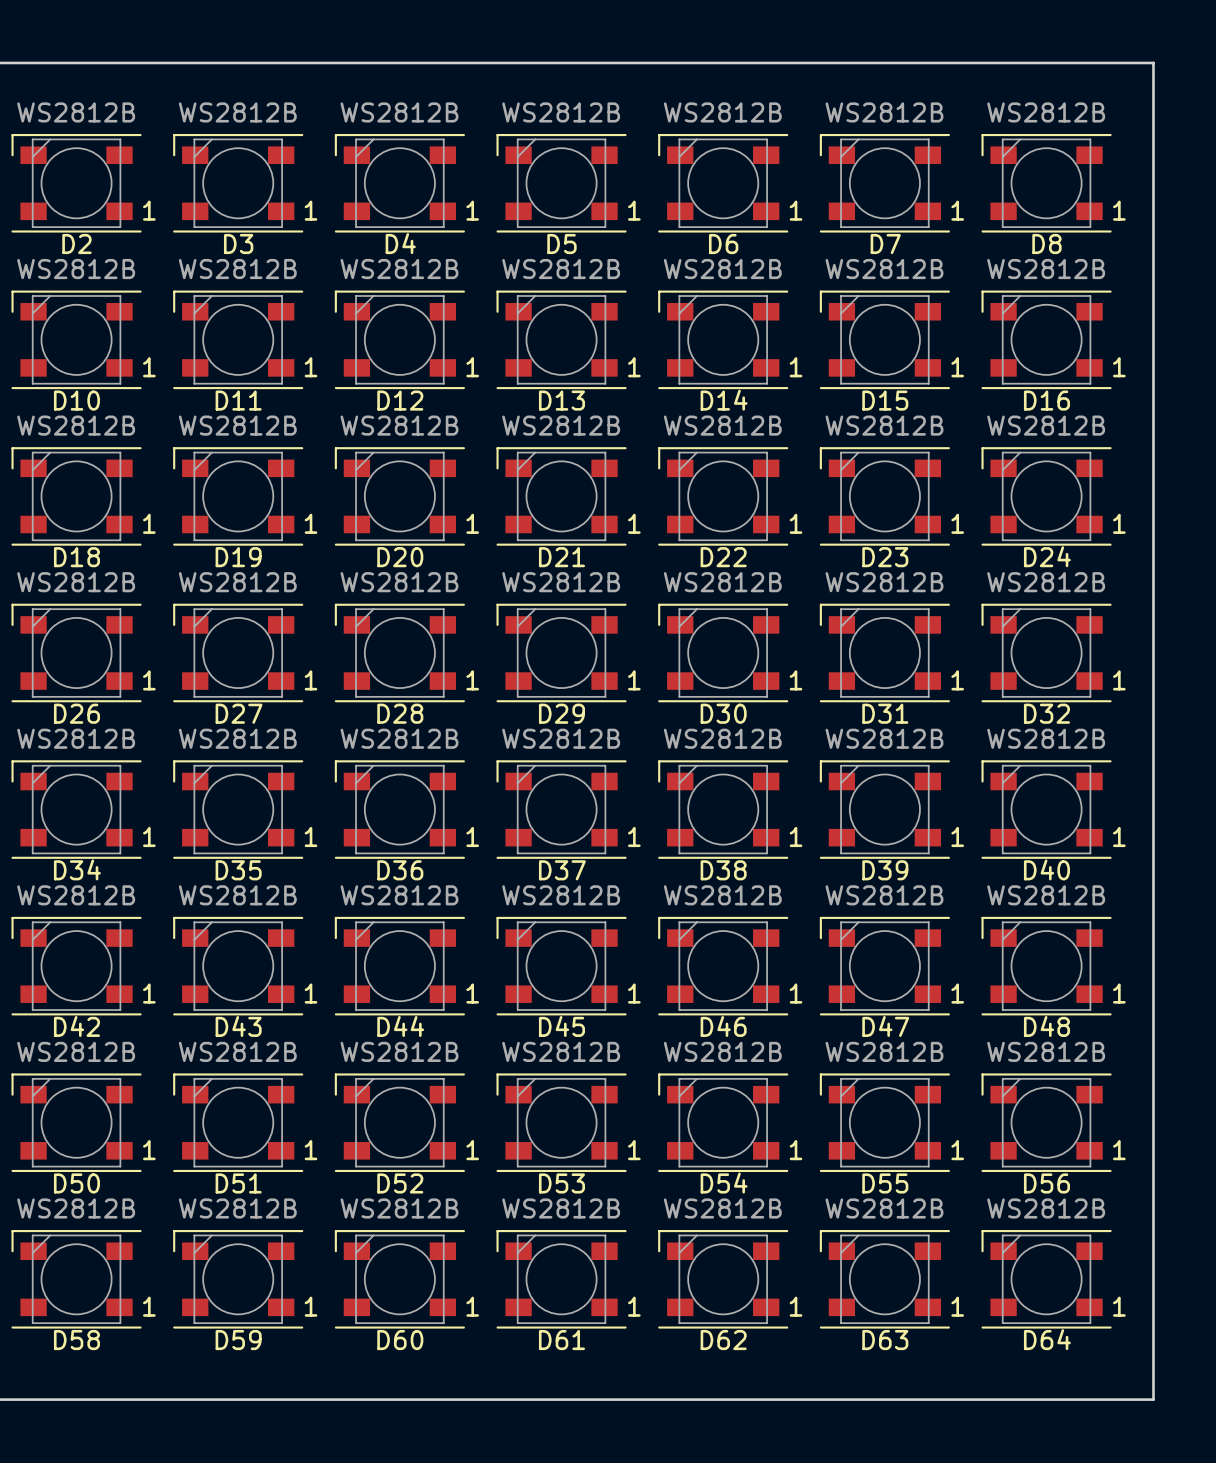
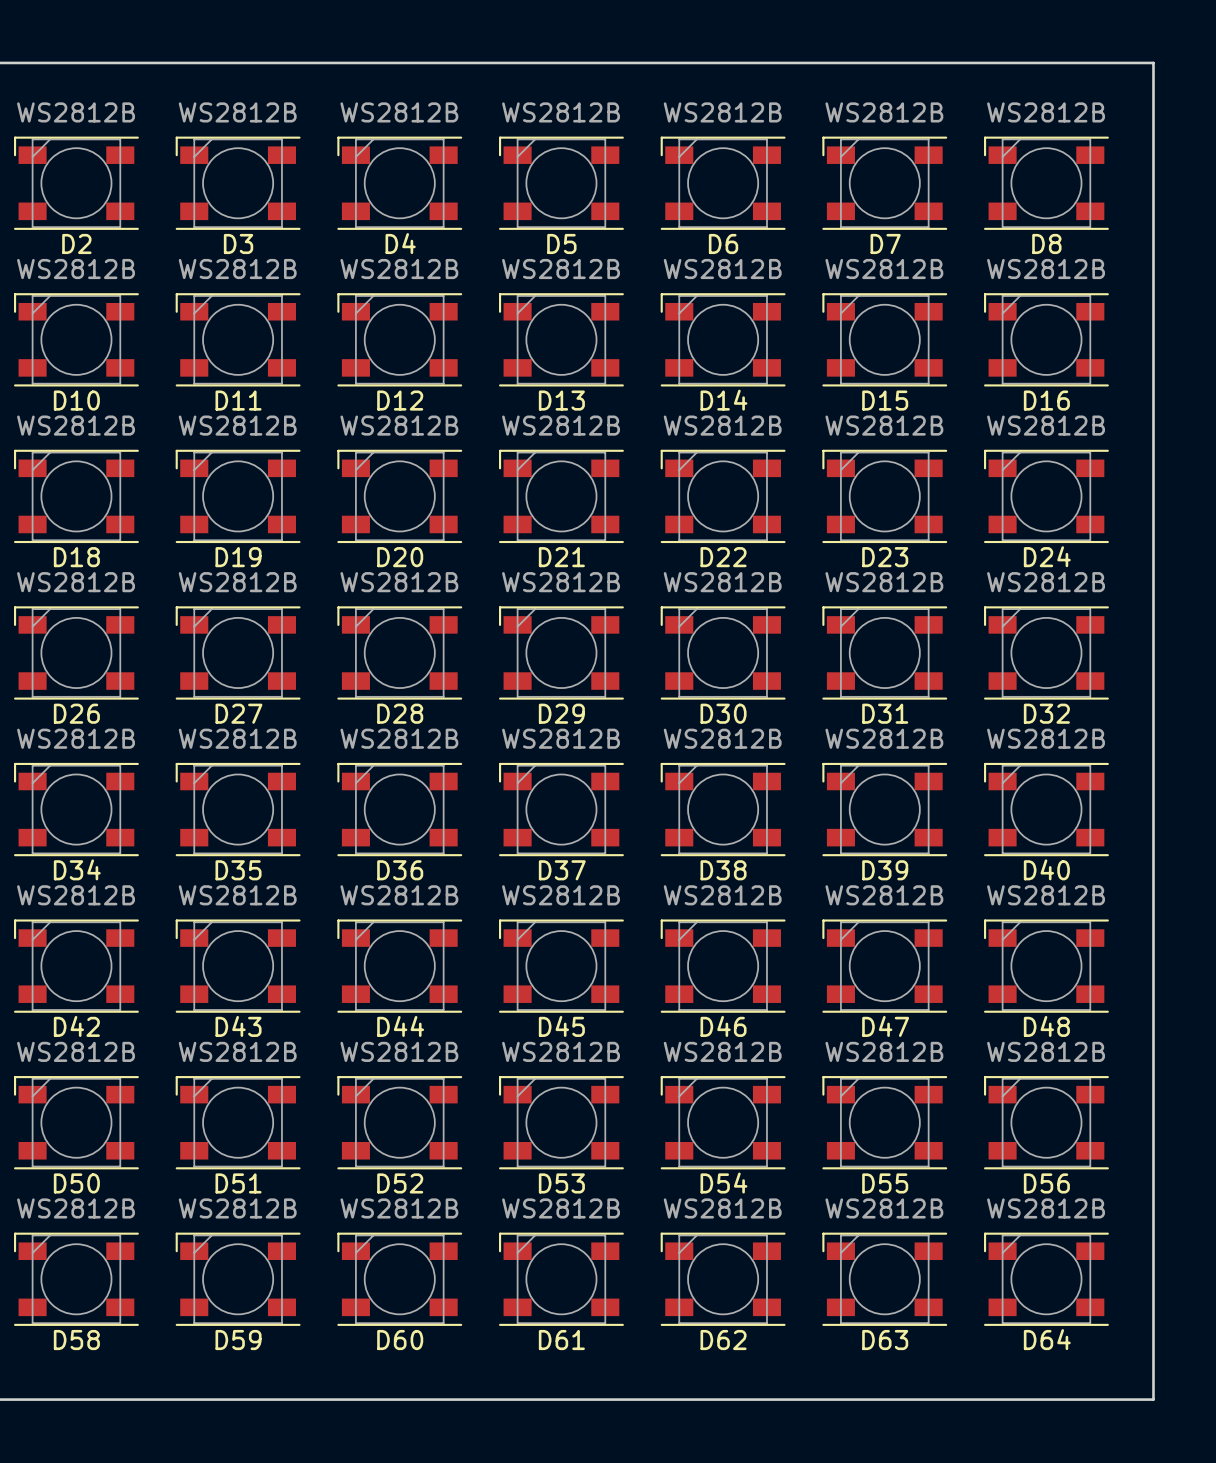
D2 footprint: [11, 133, 142, 233] -> [14, 136, 139, 230]
D3 footprint: [173, 133, 304, 233] -> [175, 136, 301, 230]
D4 footprint: [334, 133, 465, 233] -> [337, 136, 463, 230]
D5 footprint: [496, 133, 627, 233] -> [499, 136, 624, 230]
D6 footprint: [658, 133, 789, 233] -> [660, 136, 786, 230]
D7 footprint: [819, 133, 950, 233] -> [822, 136, 948, 230]
D8 footprint: [981, 133, 1112, 233] -> [984, 136, 1109, 230]
D10 footprint: [11, 290, 142, 390] -> [14, 293, 139, 387]
D11 footprint: [173, 290, 304, 390] -> [175, 293, 301, 387]
D12 footprint: [334, 290, 465, 390] -> [337, 293, 463, 387]
D13 footprint: [496, 290, 627, 390] -> [499, 293, 624, 387]
D14 footprint: [658, 290, 789, 390] -> [660, 293, 786, 387]
D15 footprint: [819, 290, 950, 390] -> [822, 293, 948, 387]
D16 footprint: [981, 290, 1112, 390] -> [984, 293, 1109, 387]
D18 footprint: [11, 447, 142, 546] -> [14, 449, 139, 544]
D19 footprint: [173, 447, 304, 546] -> [175, 449, 301, 544]
D20 footprint: [334, 447, 465, 546] -> [337, 449, 463, 544]
D21 footprint: [496, 447, 627, 546] -> [499, 449, 624, 544]
D22 footprint: [658, 447, 789, 546] -> [660, 449, 786, 544]
D23 footprint: [819, 447, 950, 546] -> [822, 449, 948, 544]
D24 footprint: [981, 447, 1112, 546] -> [984, 449, 1109, 544]
D26 footprint: [11, 603, 142, 703] -> [14, 606, 139, 700]
D27 footprint: [173, 603, 304, 703] -> [175, 606, 301, 700]
D28 footprint: [334, 603, 465, 703] -> [337, 606, 463, 700]
D29 footprint: [496, 603, 627, 703] -> [499, 606, 624, 700]
D30 footprint: [658, 603, 789, 703] -> [660, 606, 786, 700]
D31 footprint: [819, 603, 950, 703] -> [822, 606, 948, 700]
D32 footprint: [981, 603, 1112, 703] -> [984, 606, 1109, 700]
D34 footprint: [11, 760, 142, 859] -> [14, 762, 139, 857]
D35 footprint: [173, 760, 304, 859] -> [175, 762, 301, 857]
D36 footprint: [334, 760, 465, 859] -> [337, 762, 463, 857]
D37 footprint: [496, 760, 627, 859] -> [499, 762, 624, 857]
D38 footprint: [658, 760, 789, 859] -> [660, 762, 786, 857]
D39 footprint: [819, 760, 950, 859] -> [822, 762, 948, 857]
D40 footprint: [981, 760, 1112, 859] -> [984, 762, 1109, 857]
D42 footprint: [11, 916, 142, 1016] -> [14, 919, 139, 1013]
D43 footprint: [173, 916, 304, 1016] -> [175, 919, 301, 1013]
D44 footprint: [334, 916, 465, 1016] -> [337, 919, 463, 1013]
D45 footprint: [496, 916, 627, 1016] -> [499, 919, 624, 1013]
D46 footprint: [658, 916, 789, 1016] -> [660, 919, 786, 1013]
D47 footprint: [819, 916, 950, 1016] -> [822, 919, 948, 1013]
D48 footprint: [981, 916, 1112, 1016] -> [984, 919, 1109, 1013]
D50 footprint: [11, 1073, 142, 1173] -> [14, 1076, 139, 1170]
D51 footprint: [173, 1073, 304, 1173] -> [175, 1076, 301, 1170]
D52 footprint: [334, 1073, 465, 1173] -> [337, 1076, 463, 1170]
D53 footprint: [496, 1073, 627, 1173] -> [499, 1076, 624, 1170]
D54 footprint: [658, 1073, 789, 1173] -> [660, 1076, 786, 1170]
D55 footprint: [819, 1073, 950, 1173] -> [822, 1076, 948, 1170]
D56 footprint: [981, 1073, 1112, 1173] -> [984, 1076, 1109, 1170]
D58 footprint: [11, 1230, 142, 1329] -> [14, 1232, 139, 1326]
D59 footprint: [173, 1230, 304, 1329] -> [175, 1232, 301, 1326]
D60 footprint: [334, 1230, 465, 1329] -> [337, 1232, 463, 1326]
D61 footprint: [496, 1230, 627, 1329] -> [499, 1232, 624, 1326]
D62 footprint: [658, 1230, 789, 1329] -> [660, 1232, 786, 1326]
D63 footprint: [819, 1230, 950, 1329] -> [822, 1232, 948, 1326]
D64 footprint: [981, 1230, 1112, 1329] -> [984, 1232, 1109, 1326]

